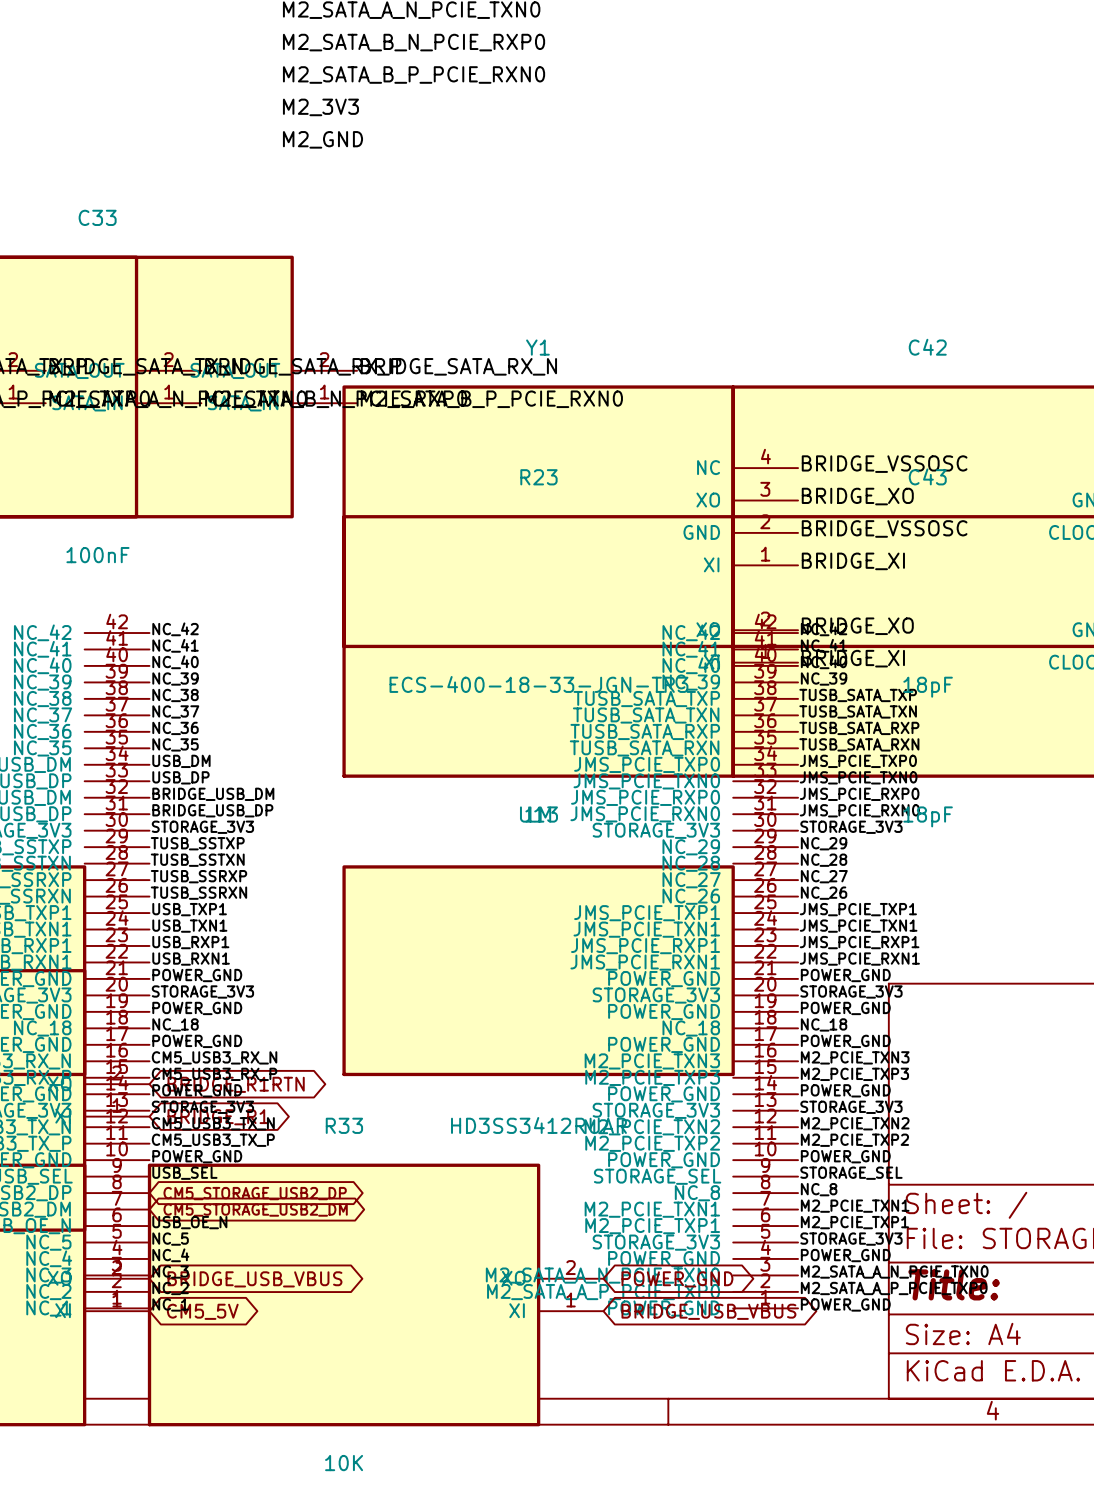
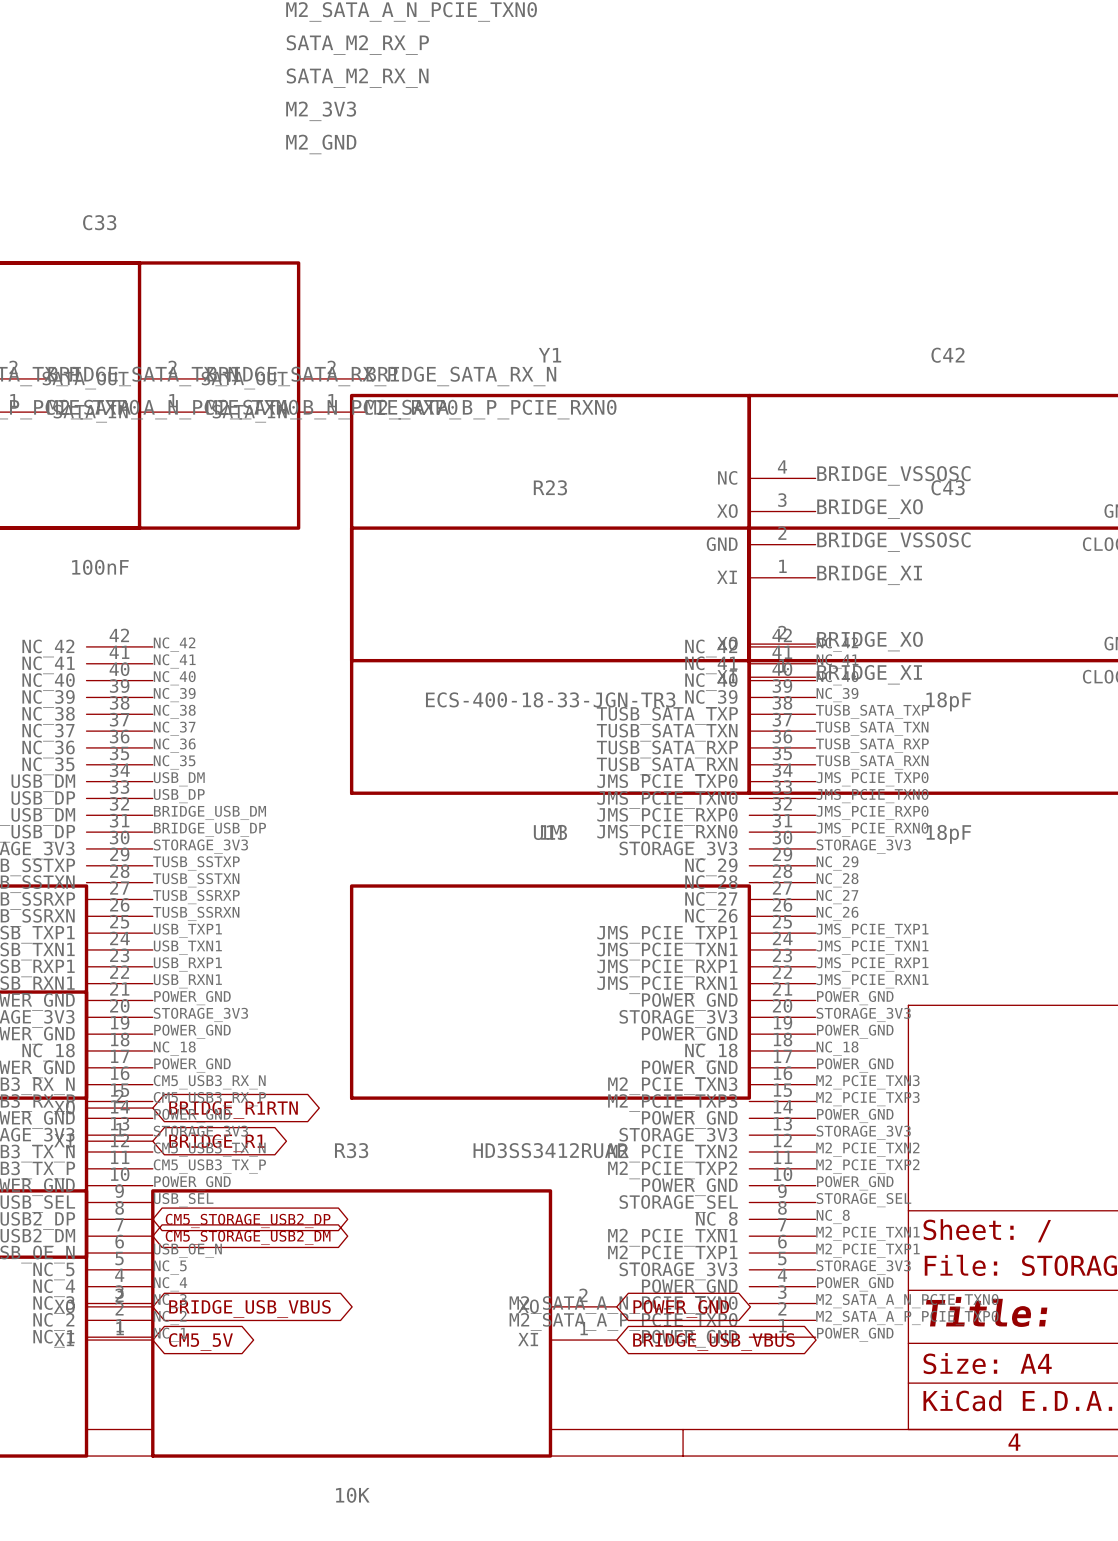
label: M2_SATA_B_N_PCIE_RXP0 (414, 42) -> SATA_M2_RX_P (357, 45)
label: M2_SATA_B_P_PCIE_RXN0 (414, 74) -> SATA_M2_RX_N (357, 78)

